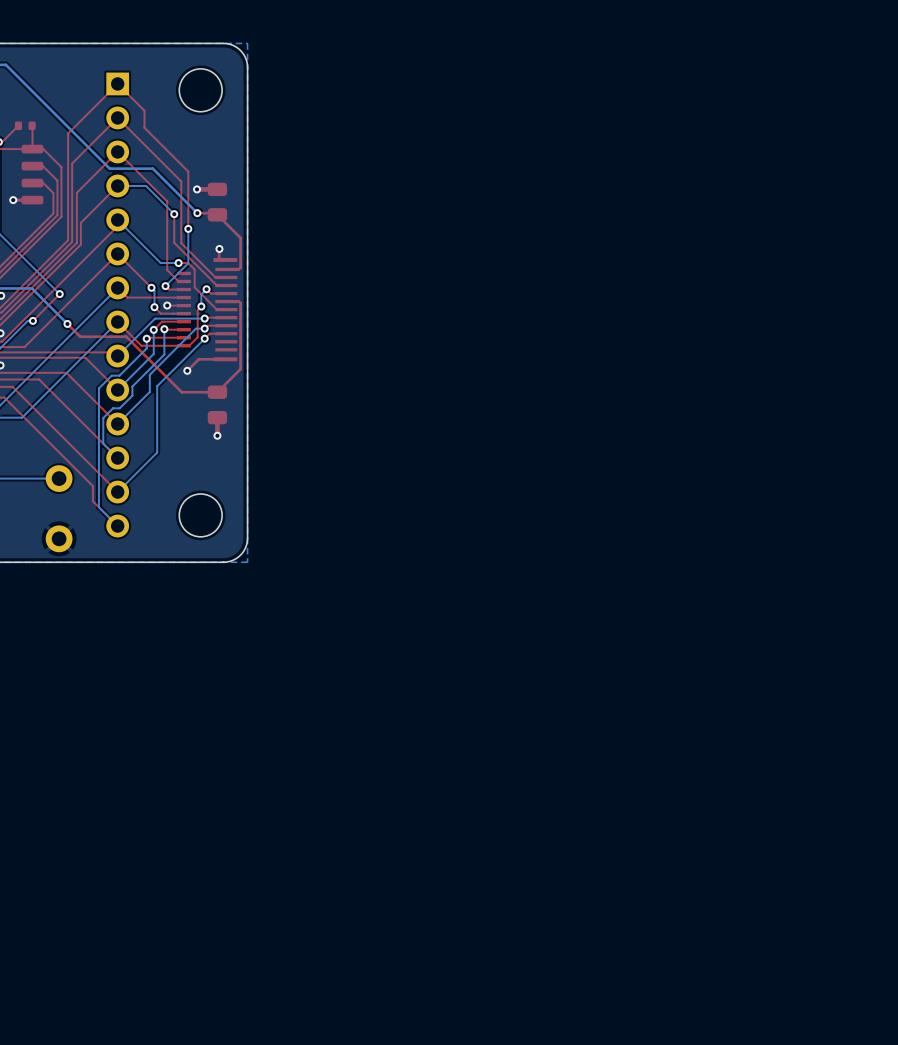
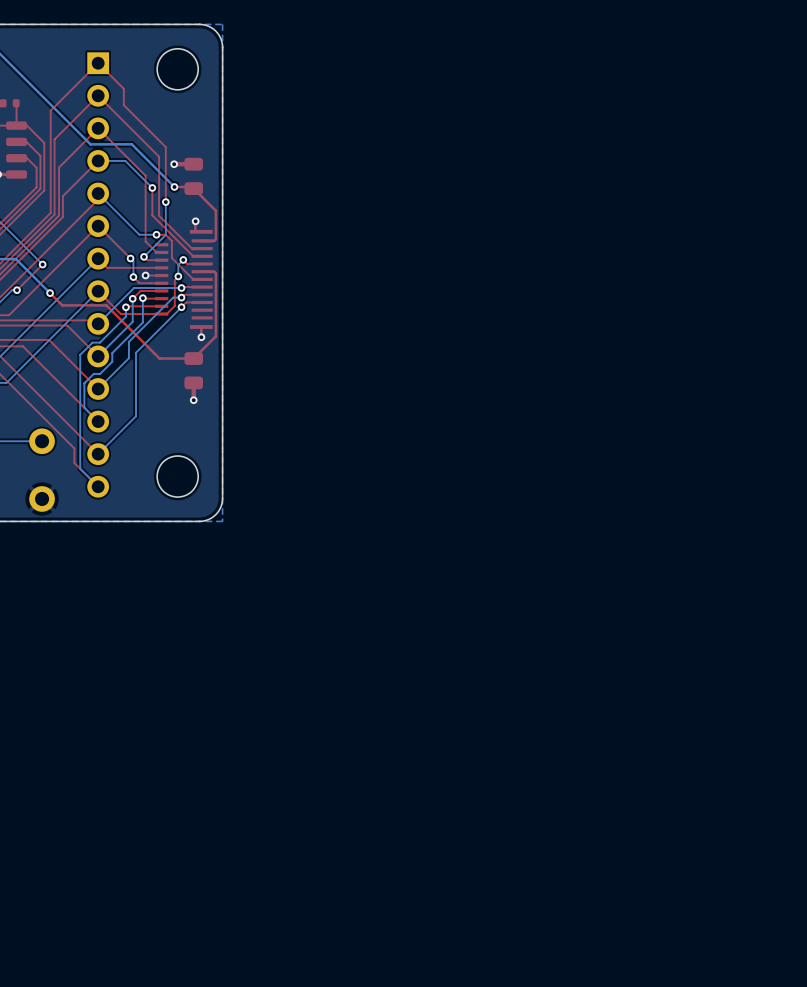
top track: (219, 359) (198, 359) (187, 370) -> none
top track: none -> (201, 326) (201, 337)
via position: (187, 370) -> (201, 337)

